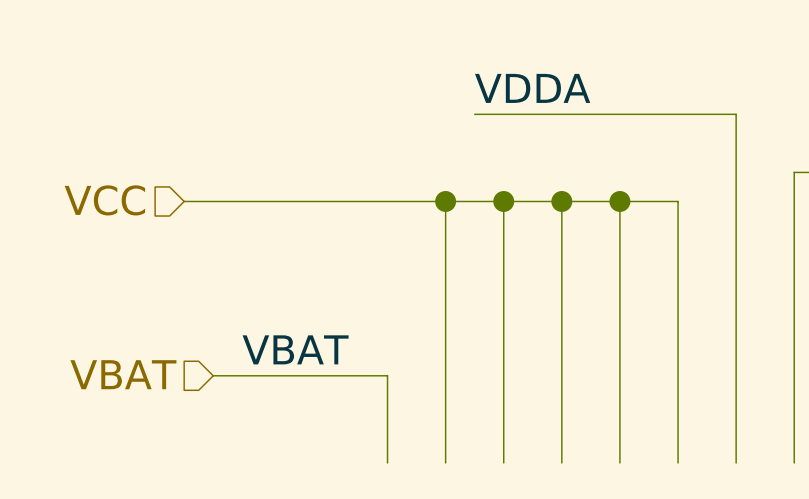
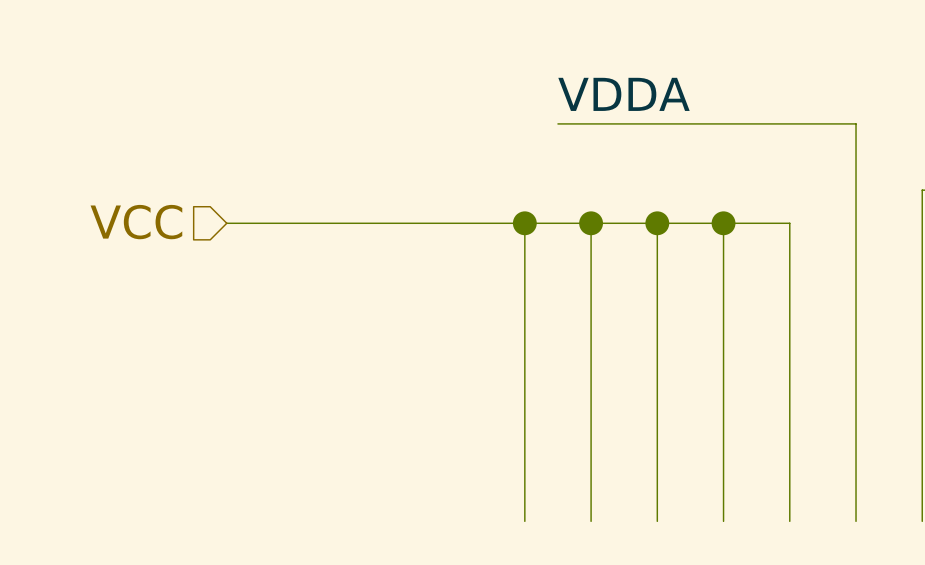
label: VBAT (295, 349) -> none
hierarchical label: VBAT (123, 374) -> none
wire: (213, 375) (387, 375) (387, 462) -> none

